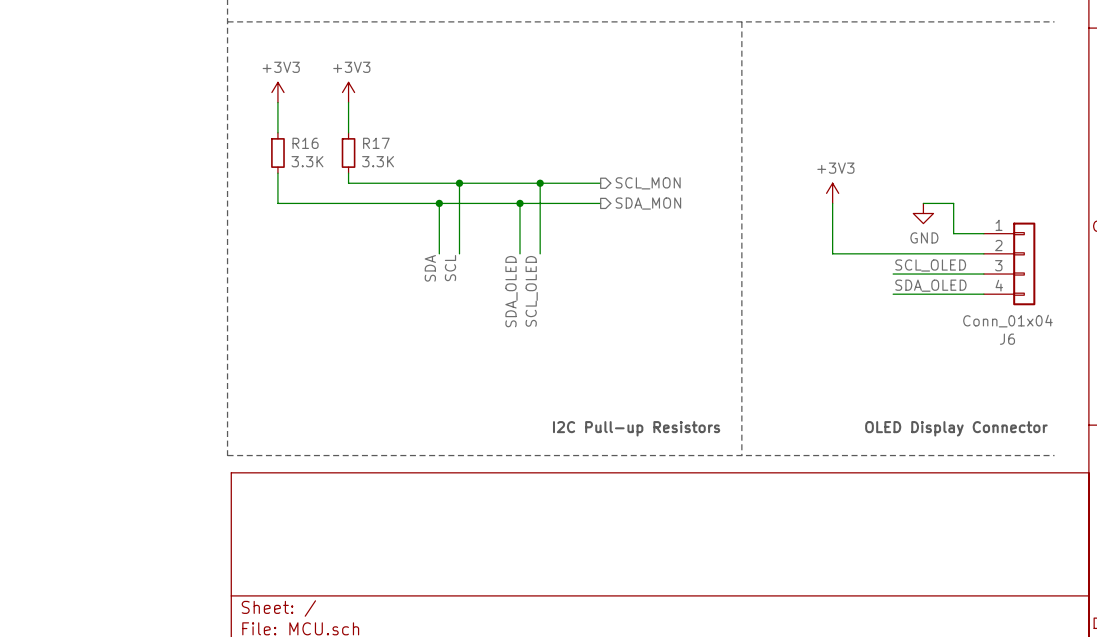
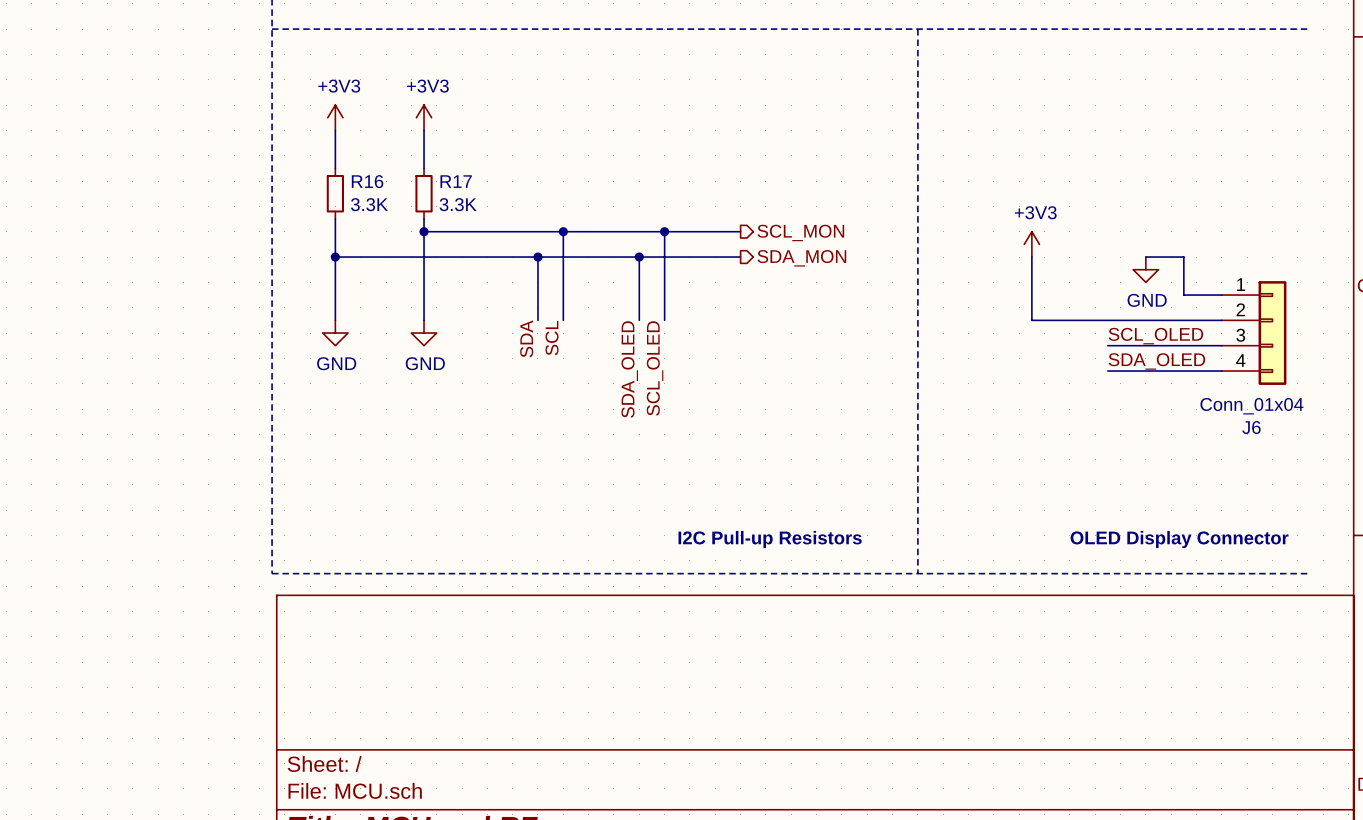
wire: none -> (424, 231) (424, 320)
junction: none -> (424, 231)
wire: none -> (335, 257) (335, 320)
junction: none -> (335, 257)
power symbol: none -> GND (335, 333)
power symbol: none -> GND (424, 333)

